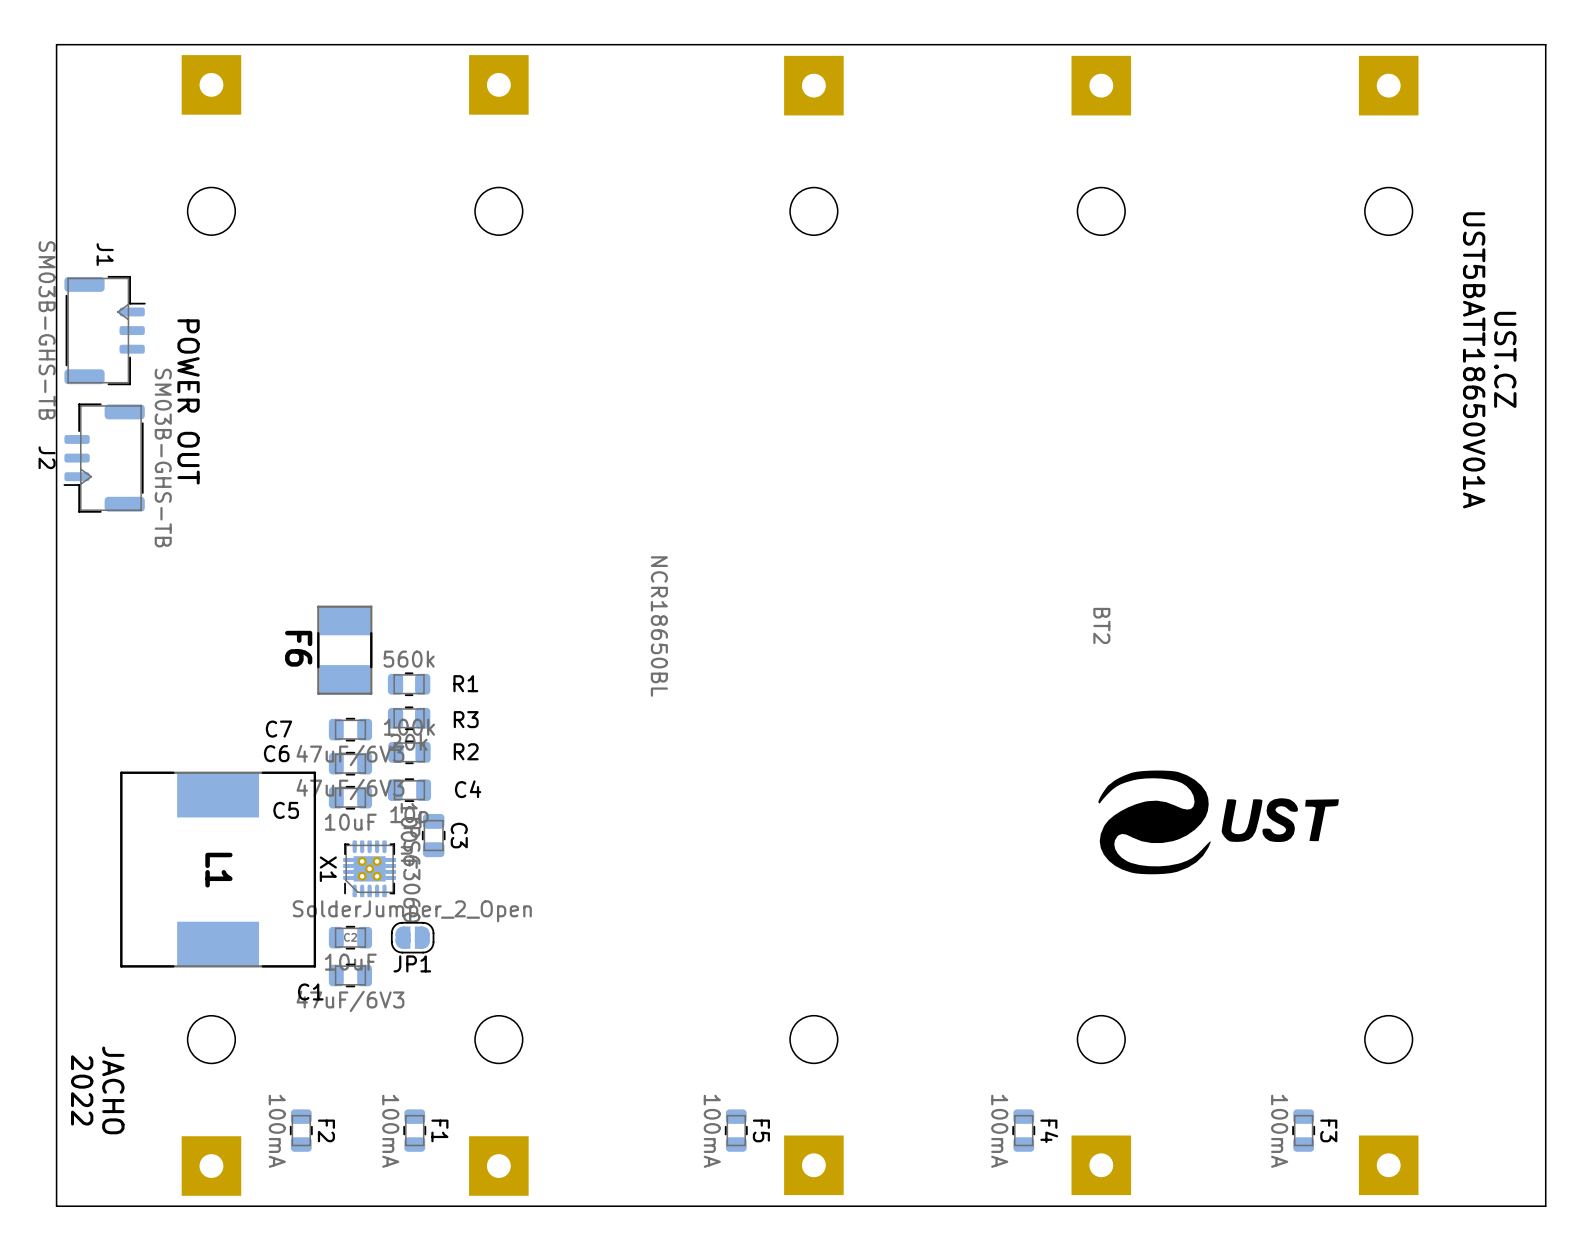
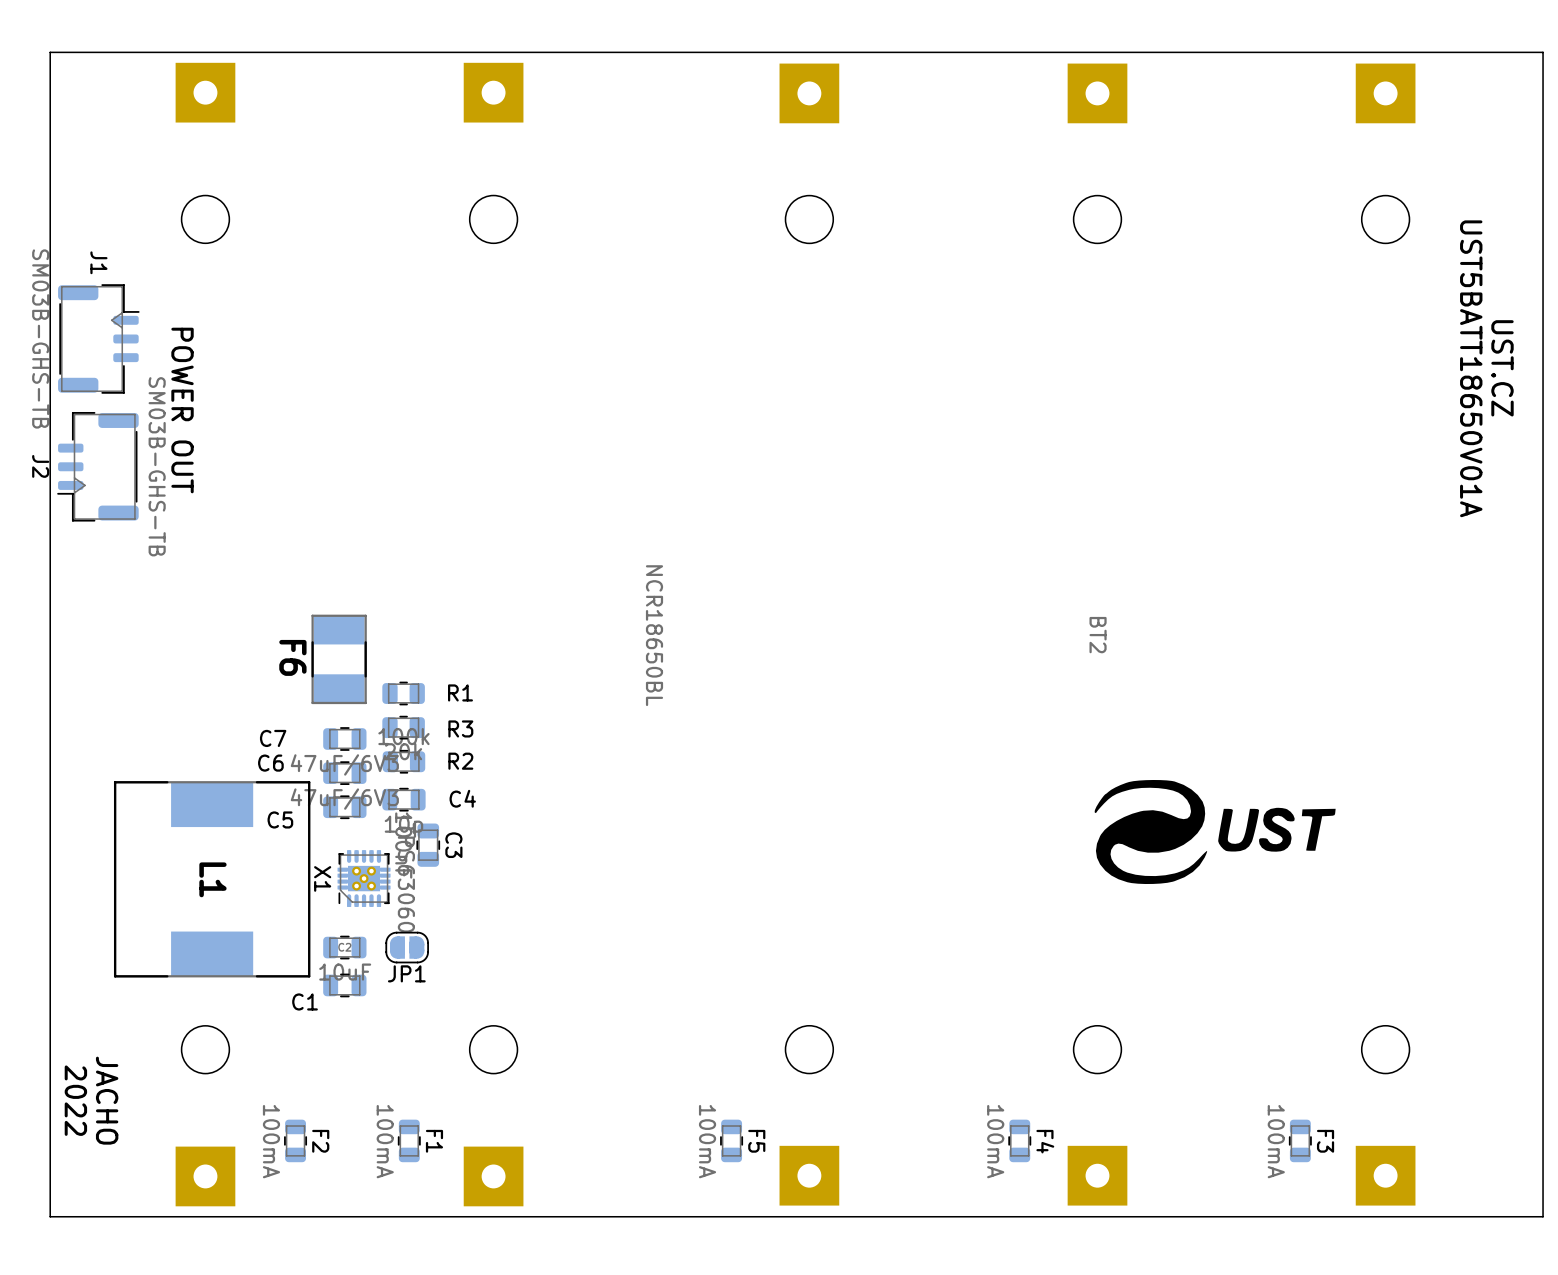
R1 value: 560k (409, 659) -> none
C5 value: 10uF (350, 822) -> none
JP1 value: SolderJumper_2_Open (412, 911) -> none
C1 value: 47uF/6V3 (350, 1001) -> none

